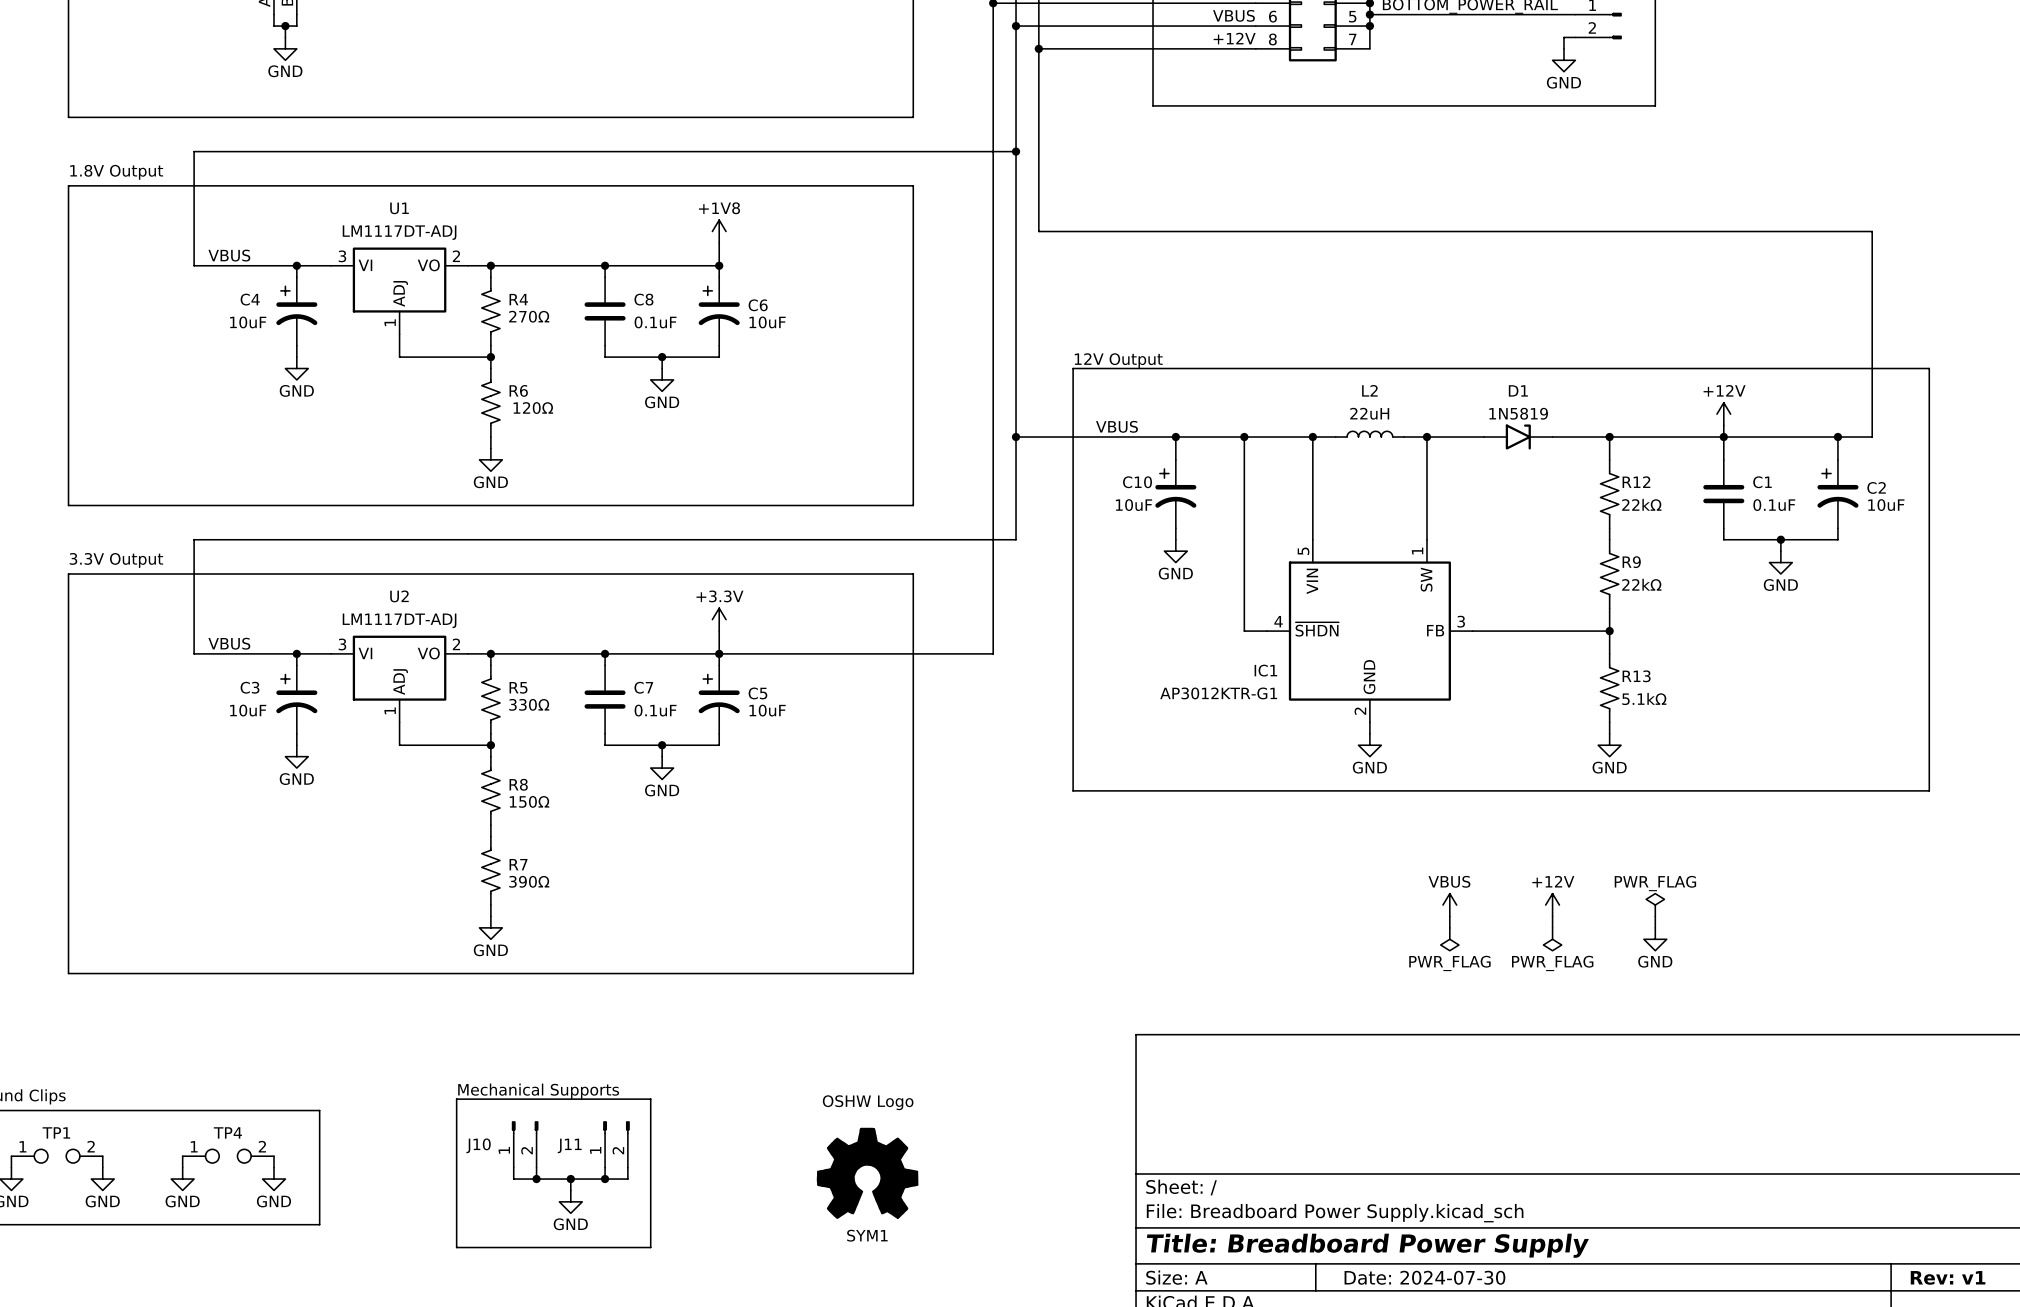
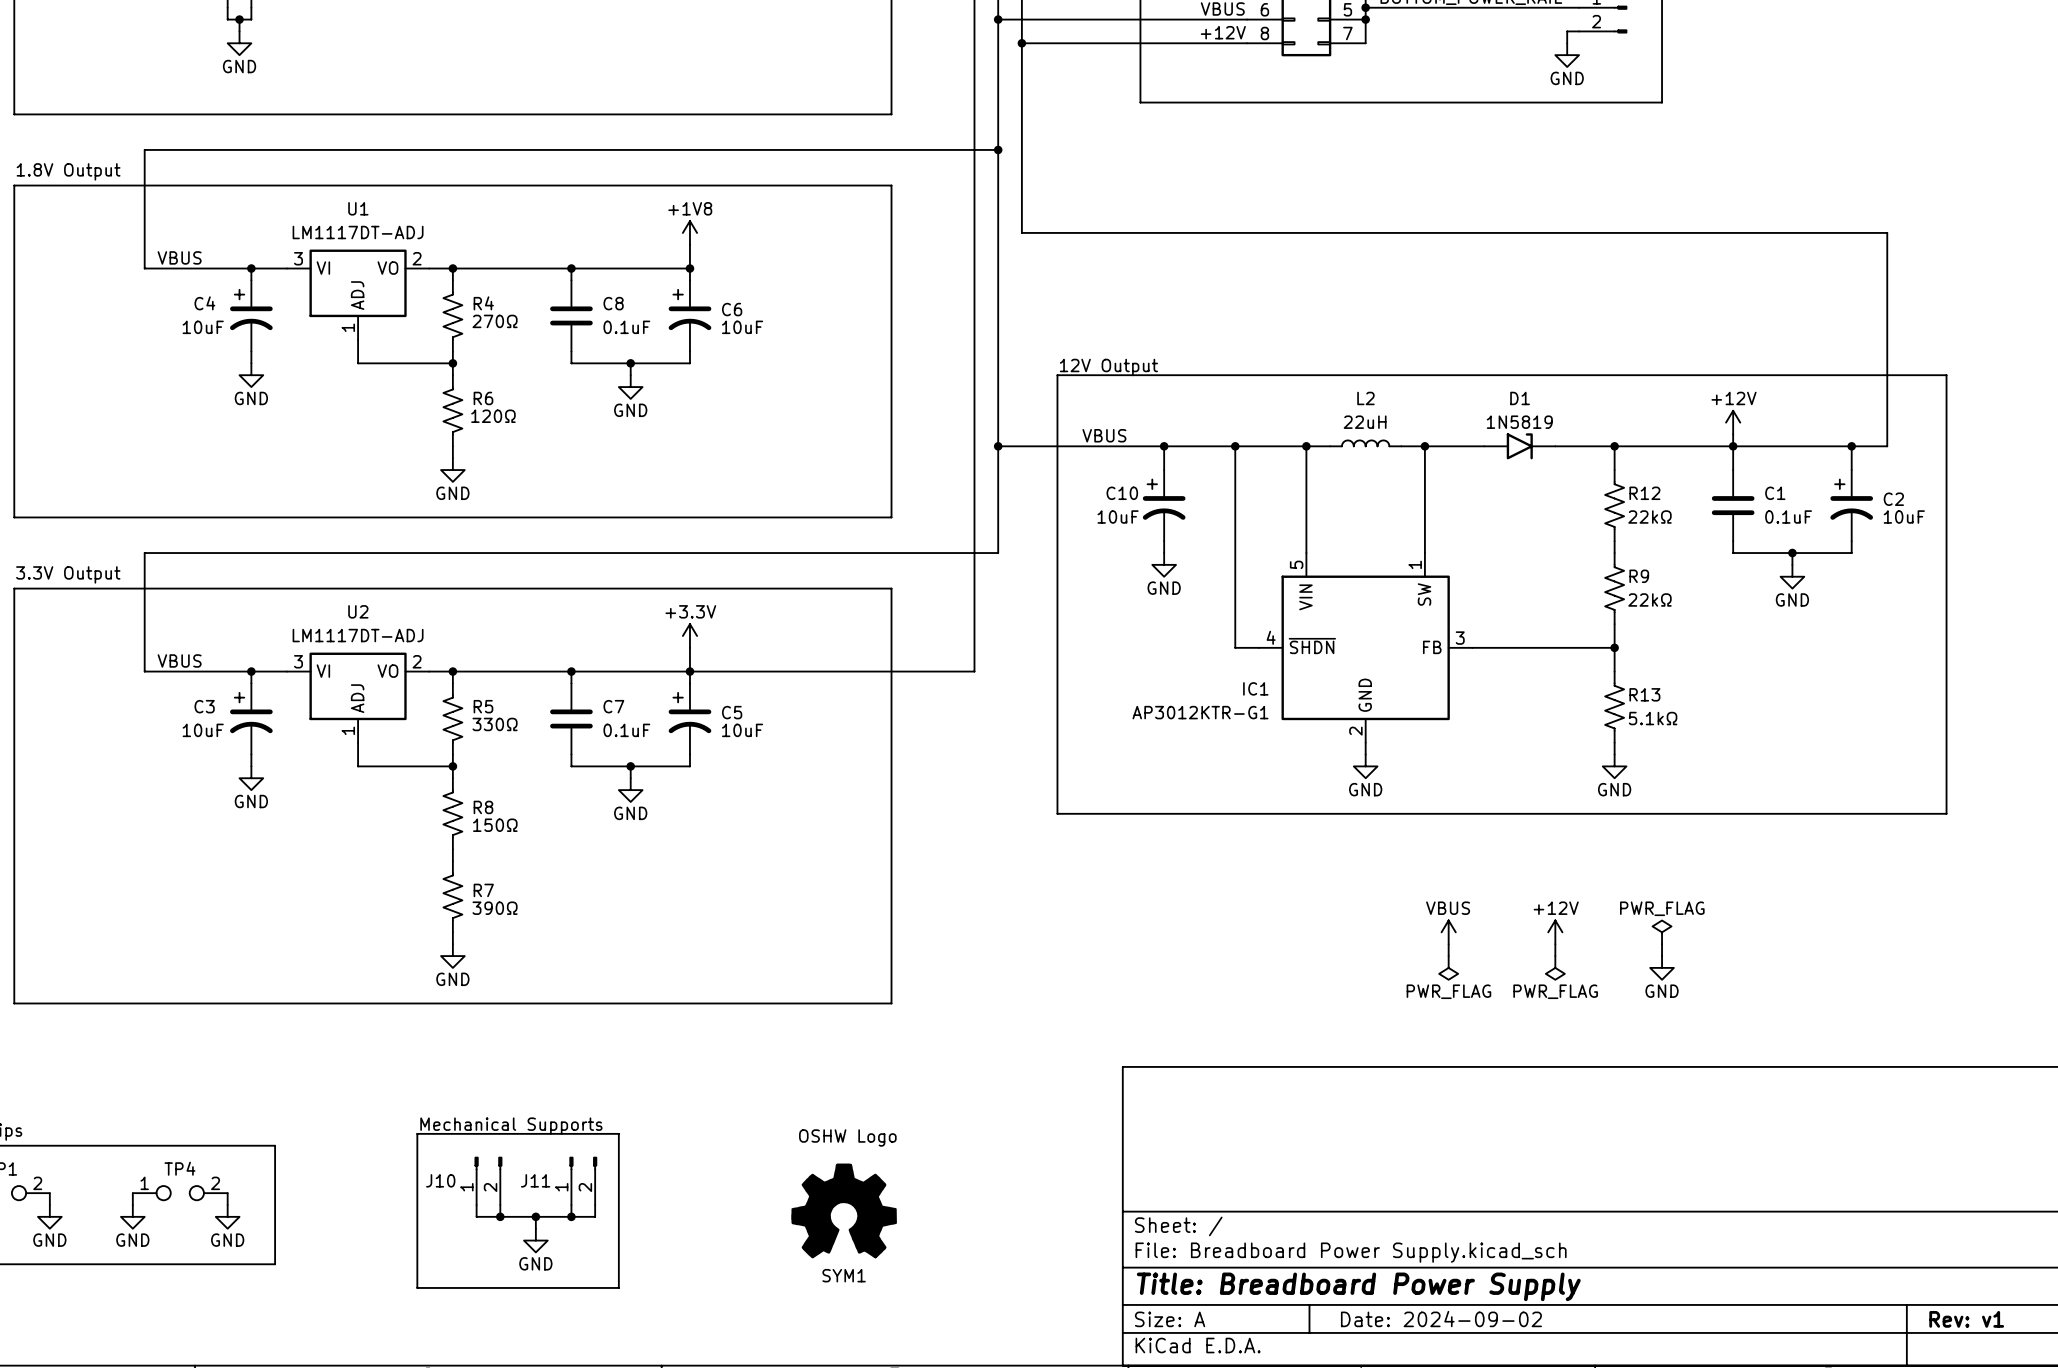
title block: Date: 2024-07-30 (1424, 1277) -> Date: 2024-09-02 (1441, 1319)

